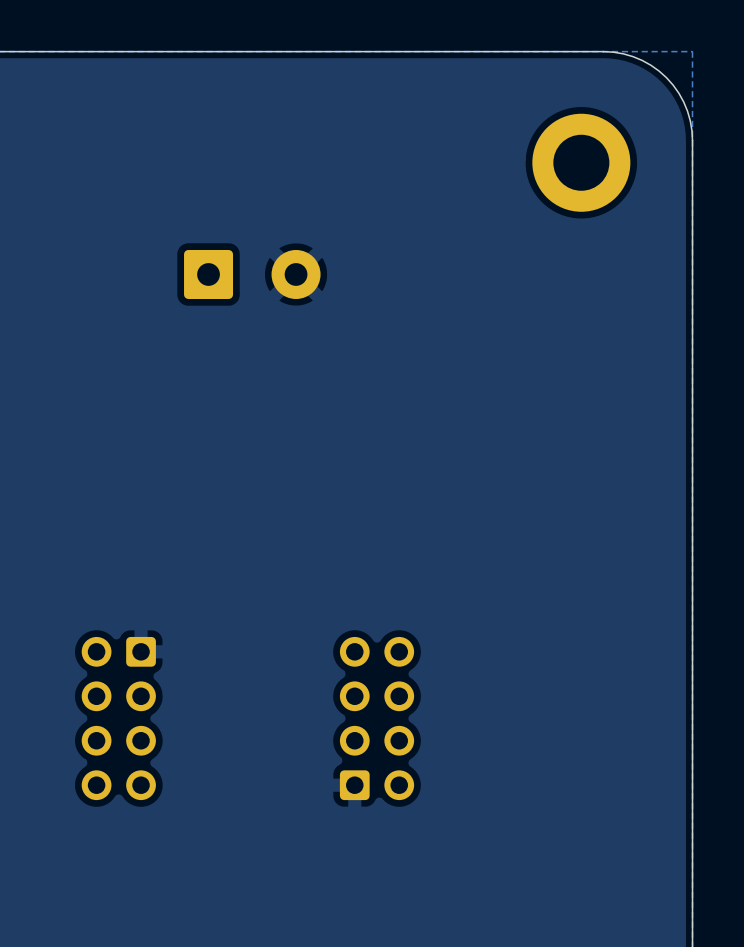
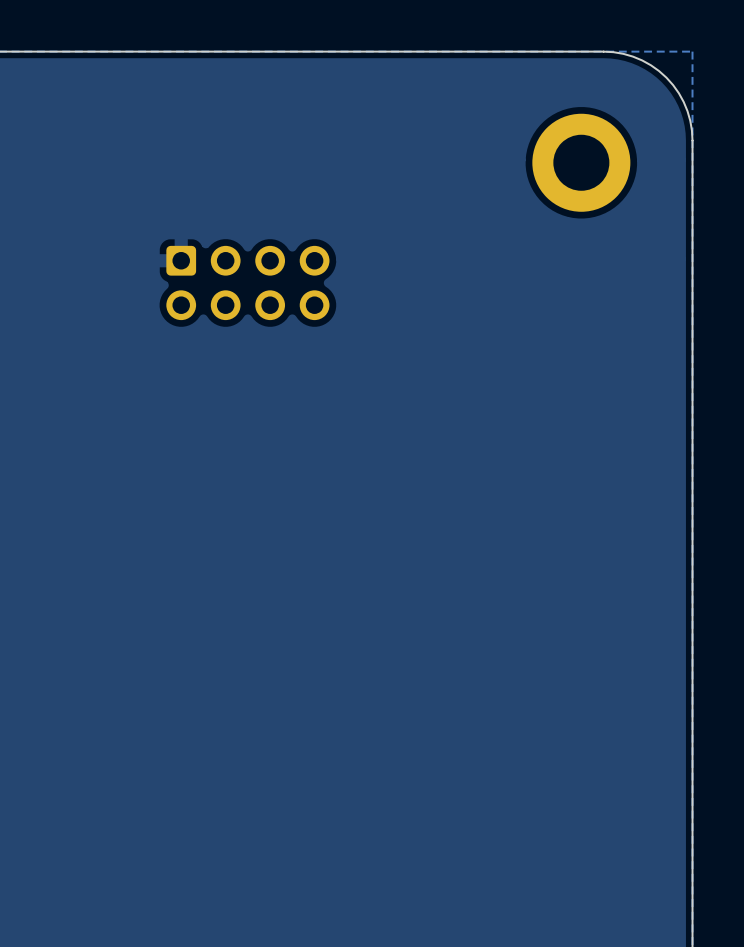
part footprint: [184, 249, 321, 299] -> [166, 245, 330, 321]
part: (118, 718) -> none
part: (377, 718) -> none

